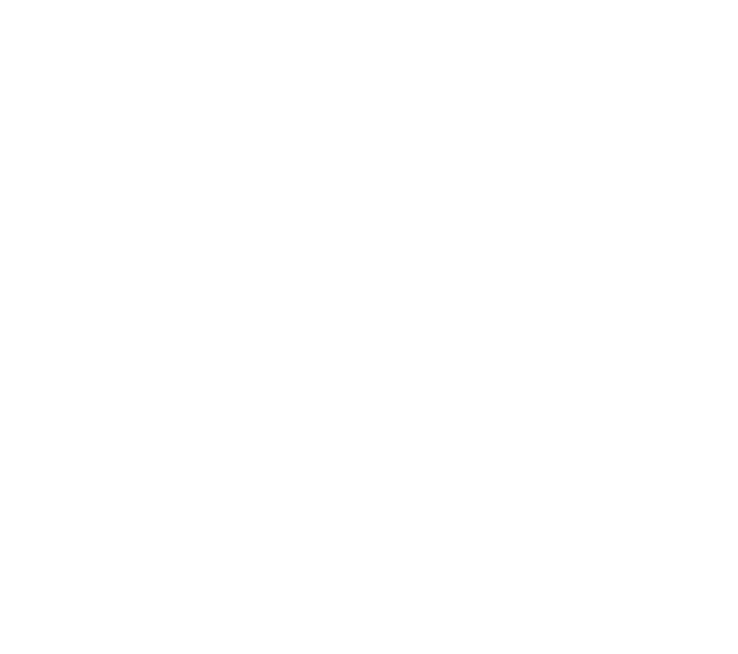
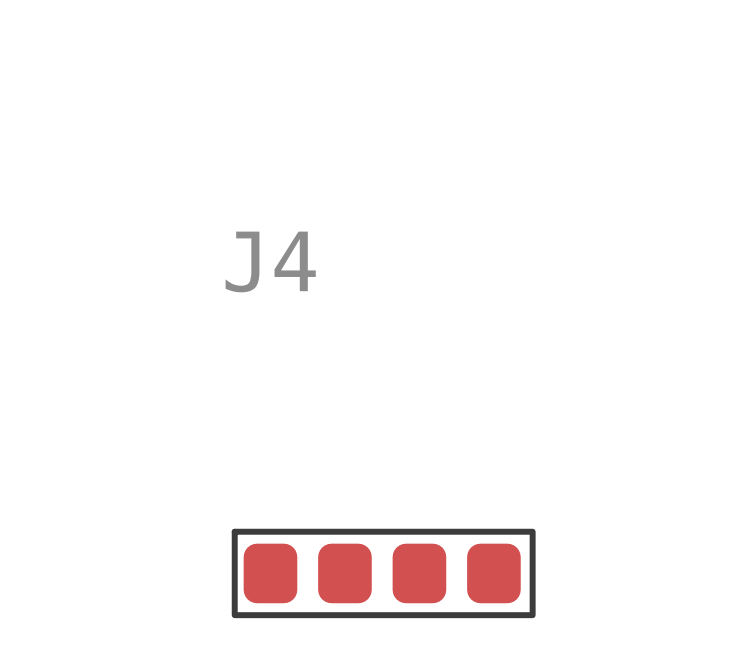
J4: none -> (383, 573)

